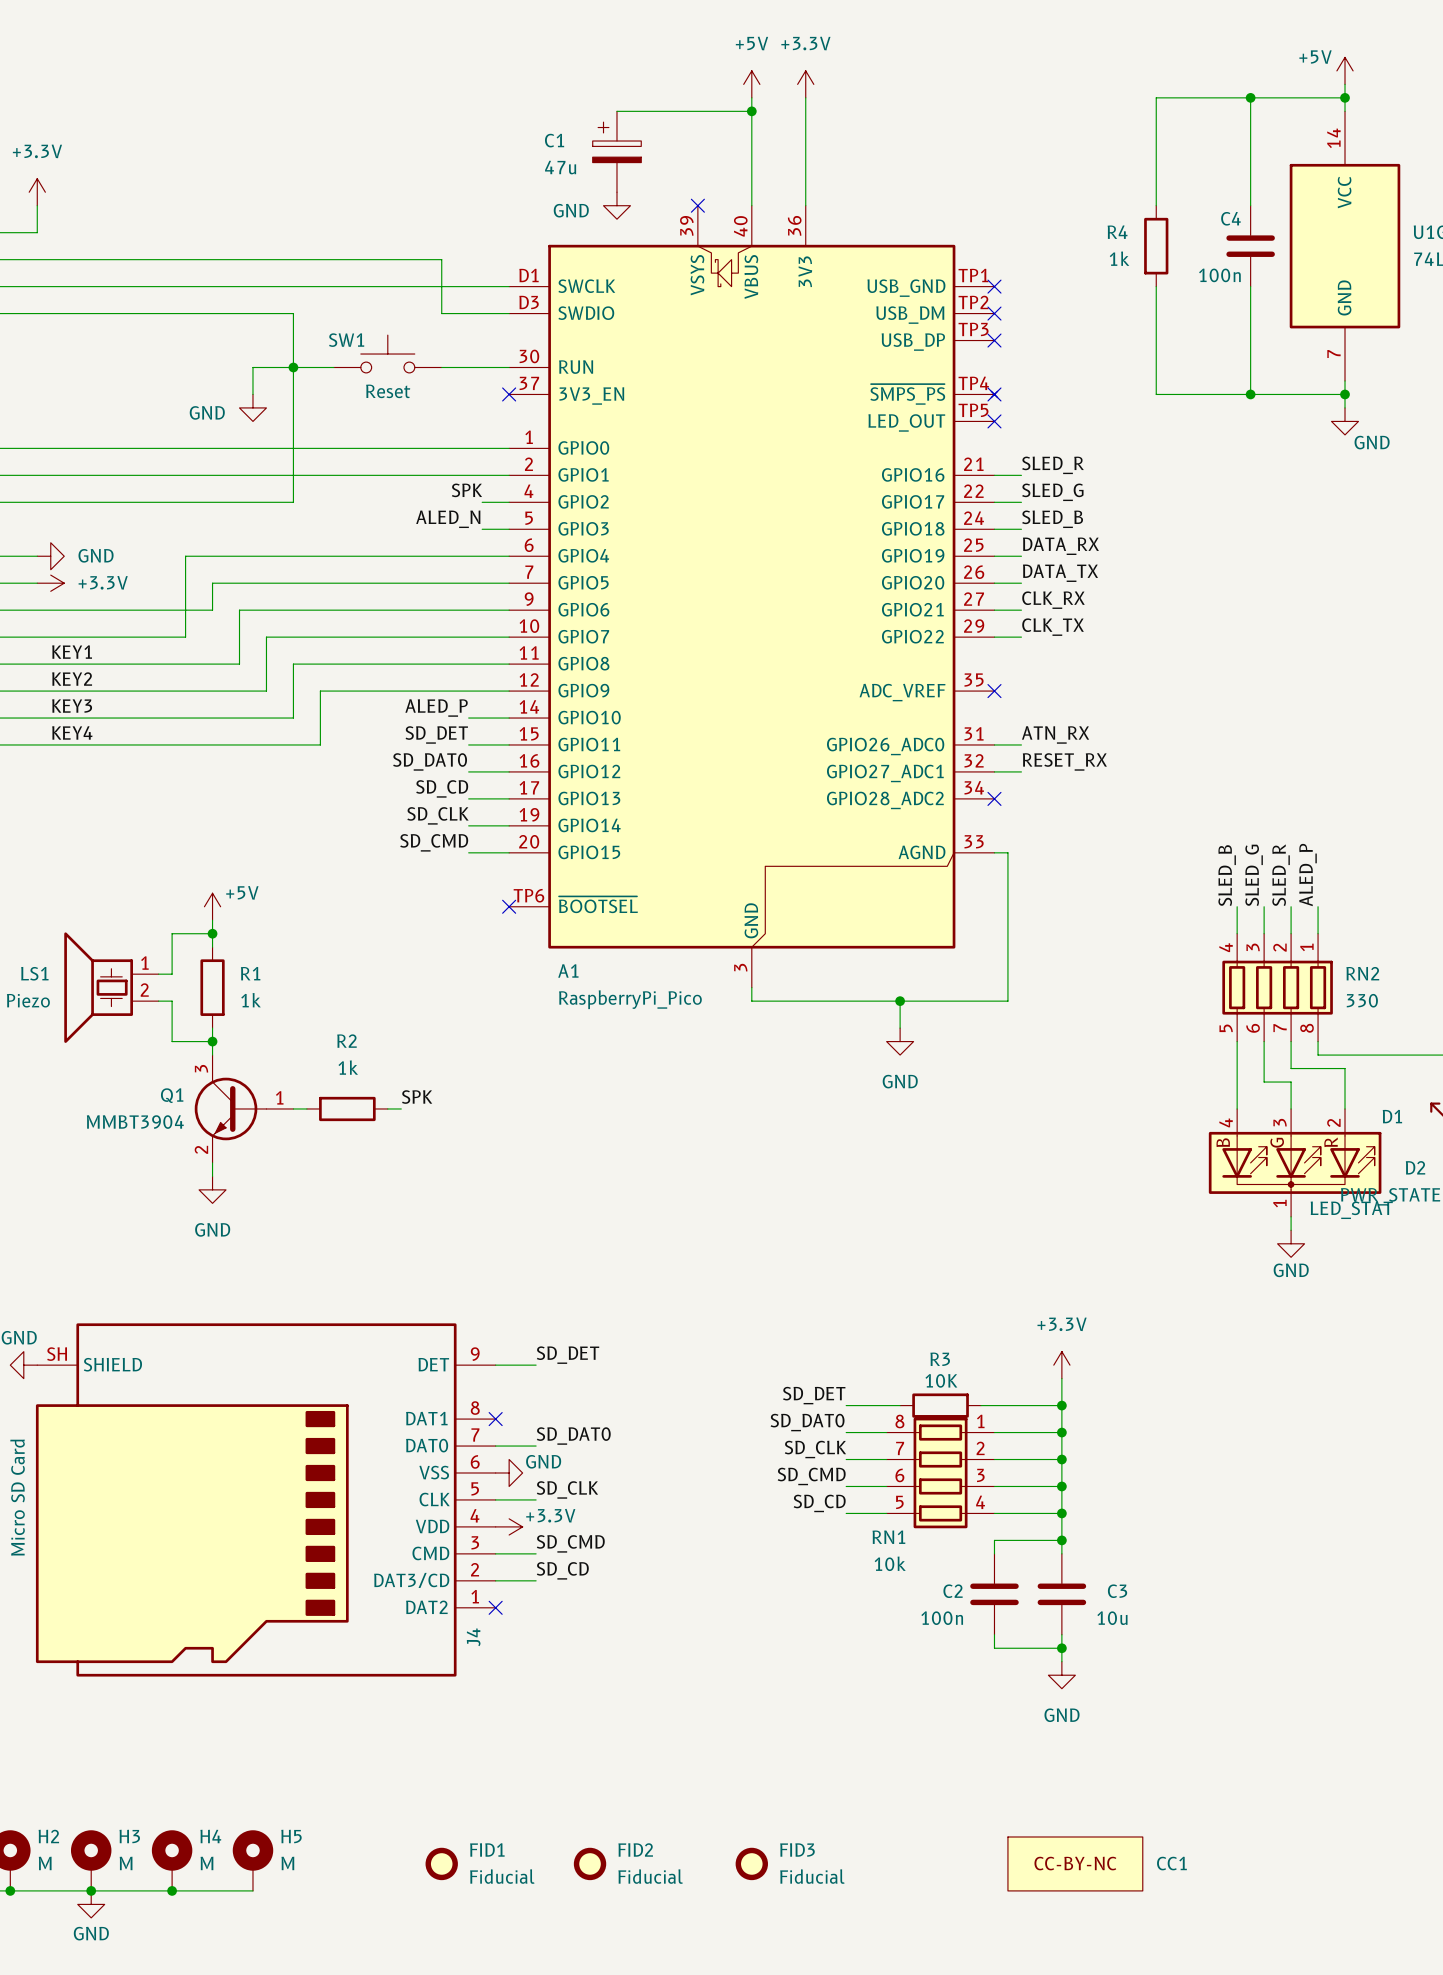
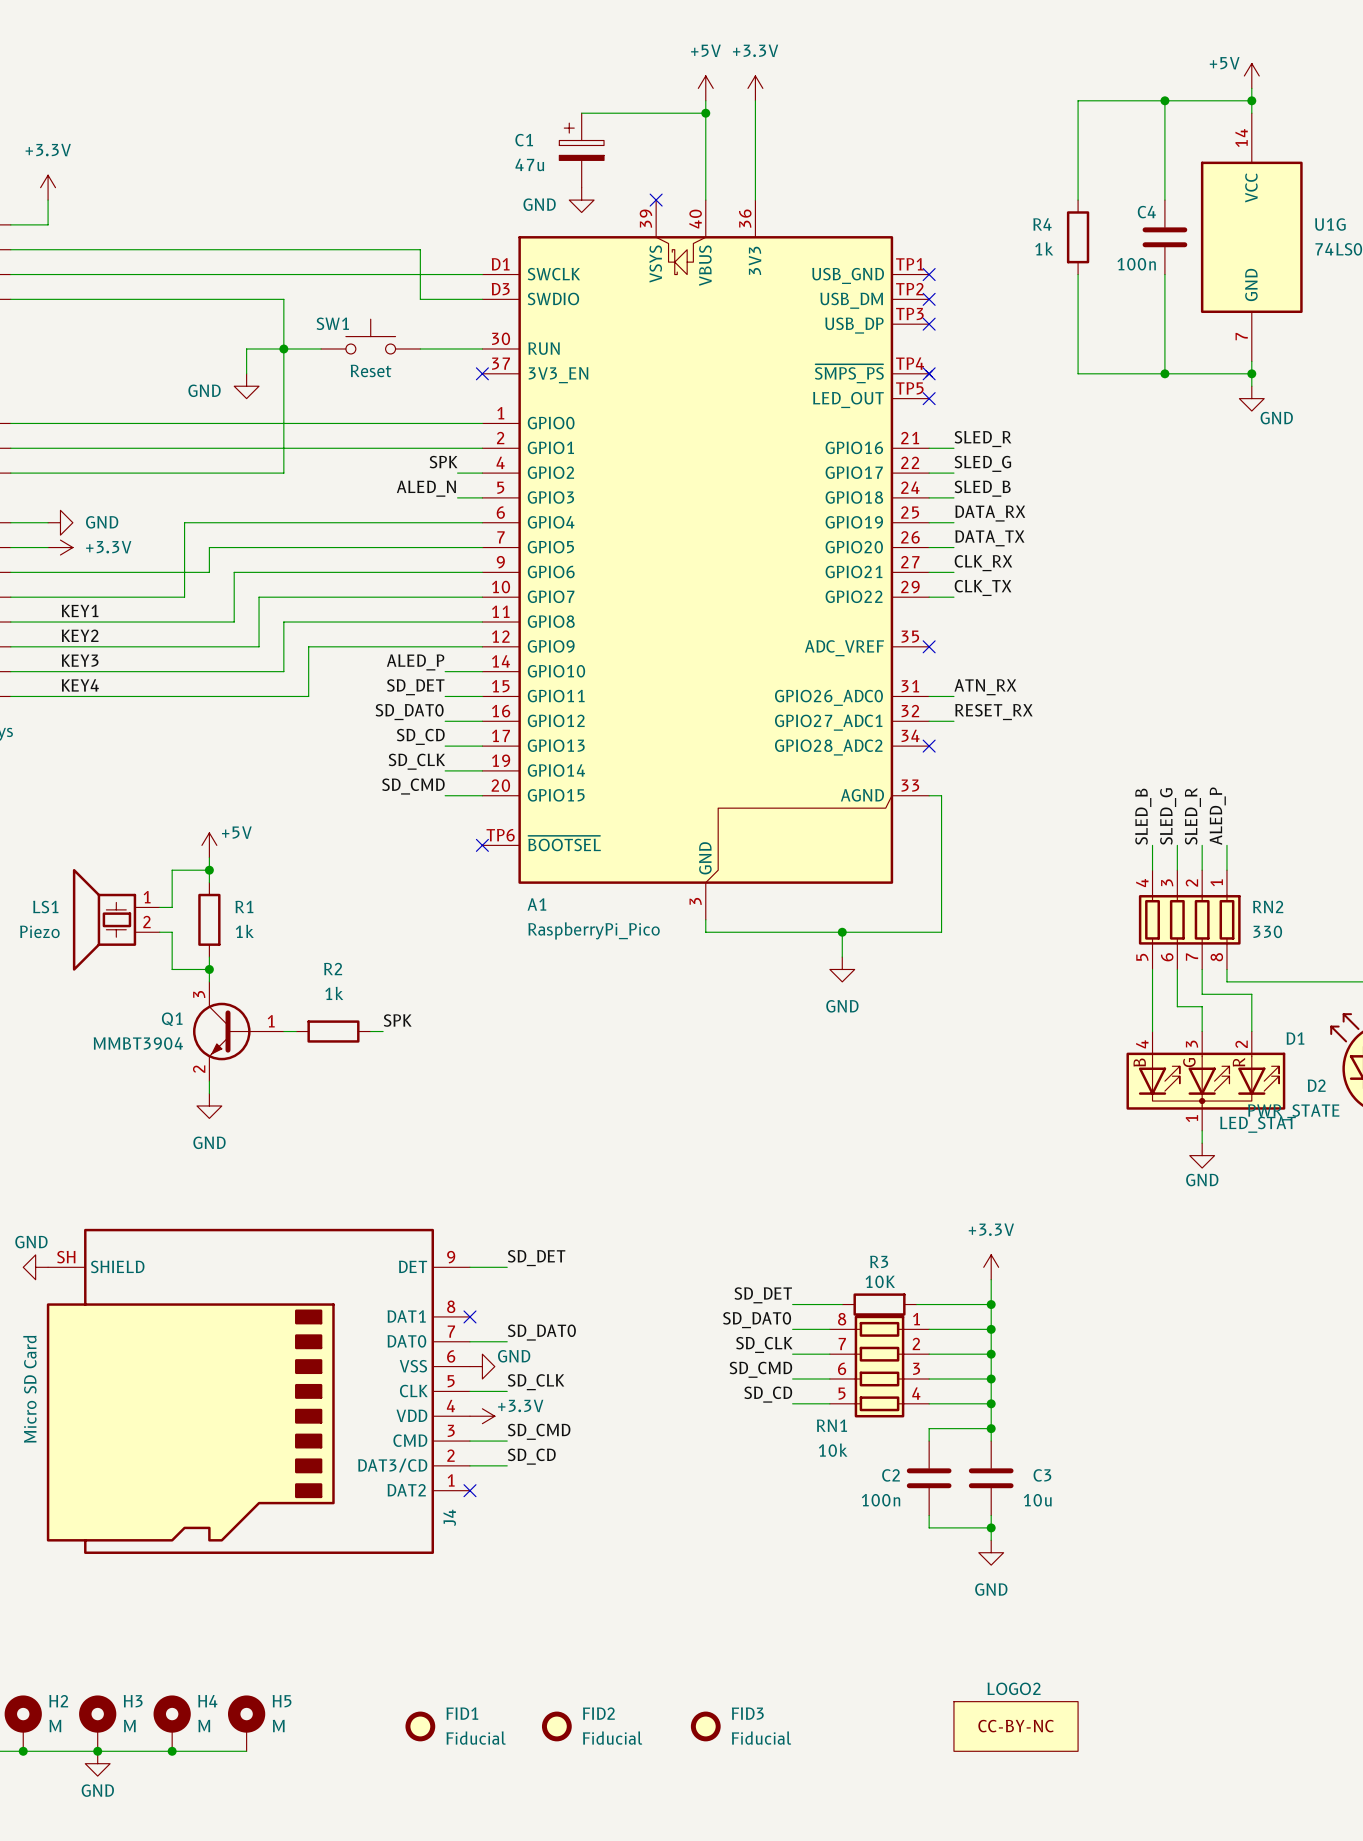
CC1: (1075, 1863) -> none
LOGO2: none -> (1016, 1726)

